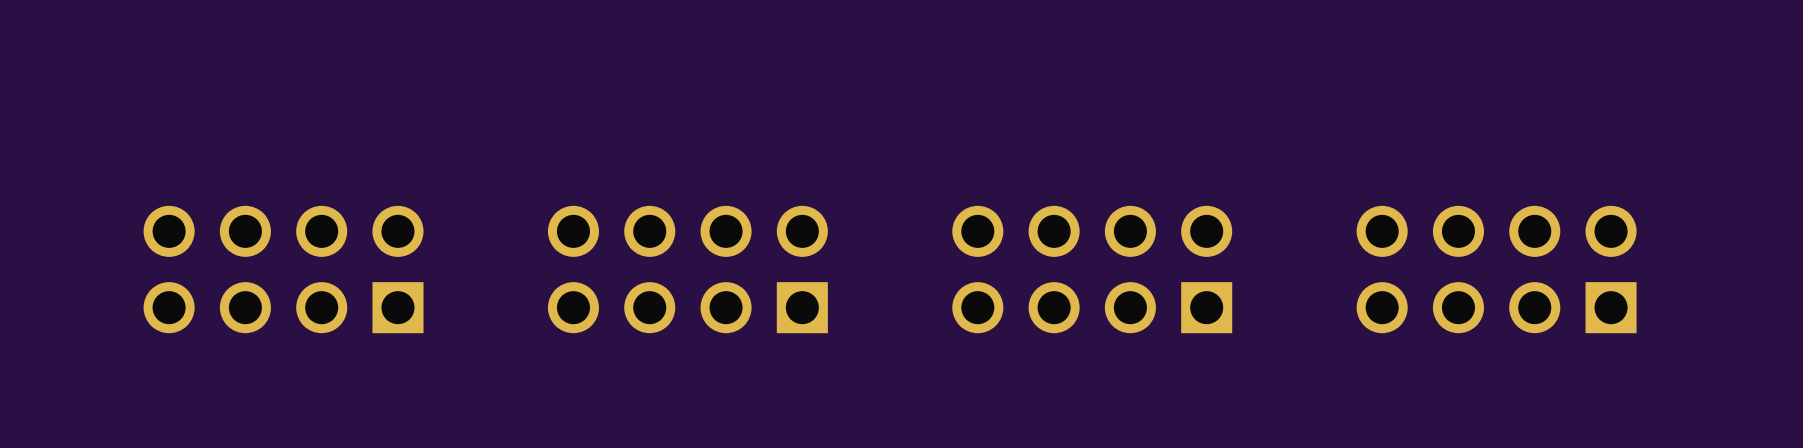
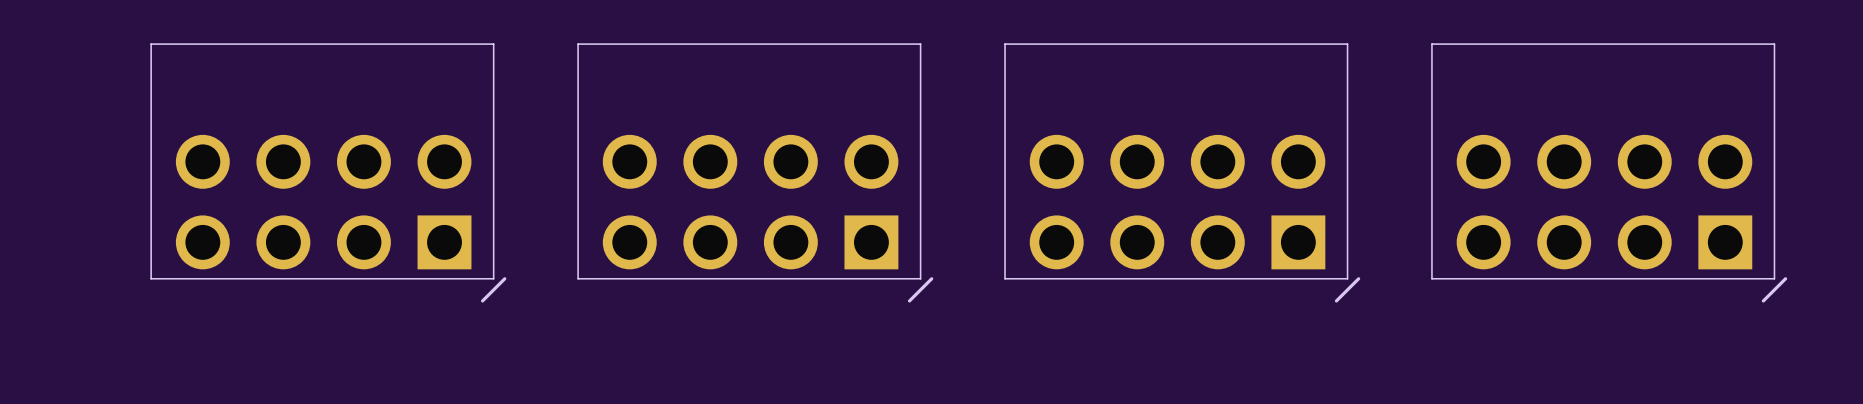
board edge: none -> (493, 44) (151, 44) (151, 278) (493, 278) (493, 44)
board edge: none -> (920, 44) (578, 44) (578, 278) (920, 278) (920, 44)
board edge: none -> (1347, 44) (1005, 44) (1005, 278) (1347, 278) (1347, 44)
board edge: none -> (1774, 44) (1431, 44) (1431, 278) (1774, 278) (1774, 44)
board edge: none -> (504, 278) (482, 300)
board edge: none -> (931, 278) (909, 300)
board edge: none -> (1358, 278) (1336, 300)
board edge: none -> (1785, 278) (1763, 300)

